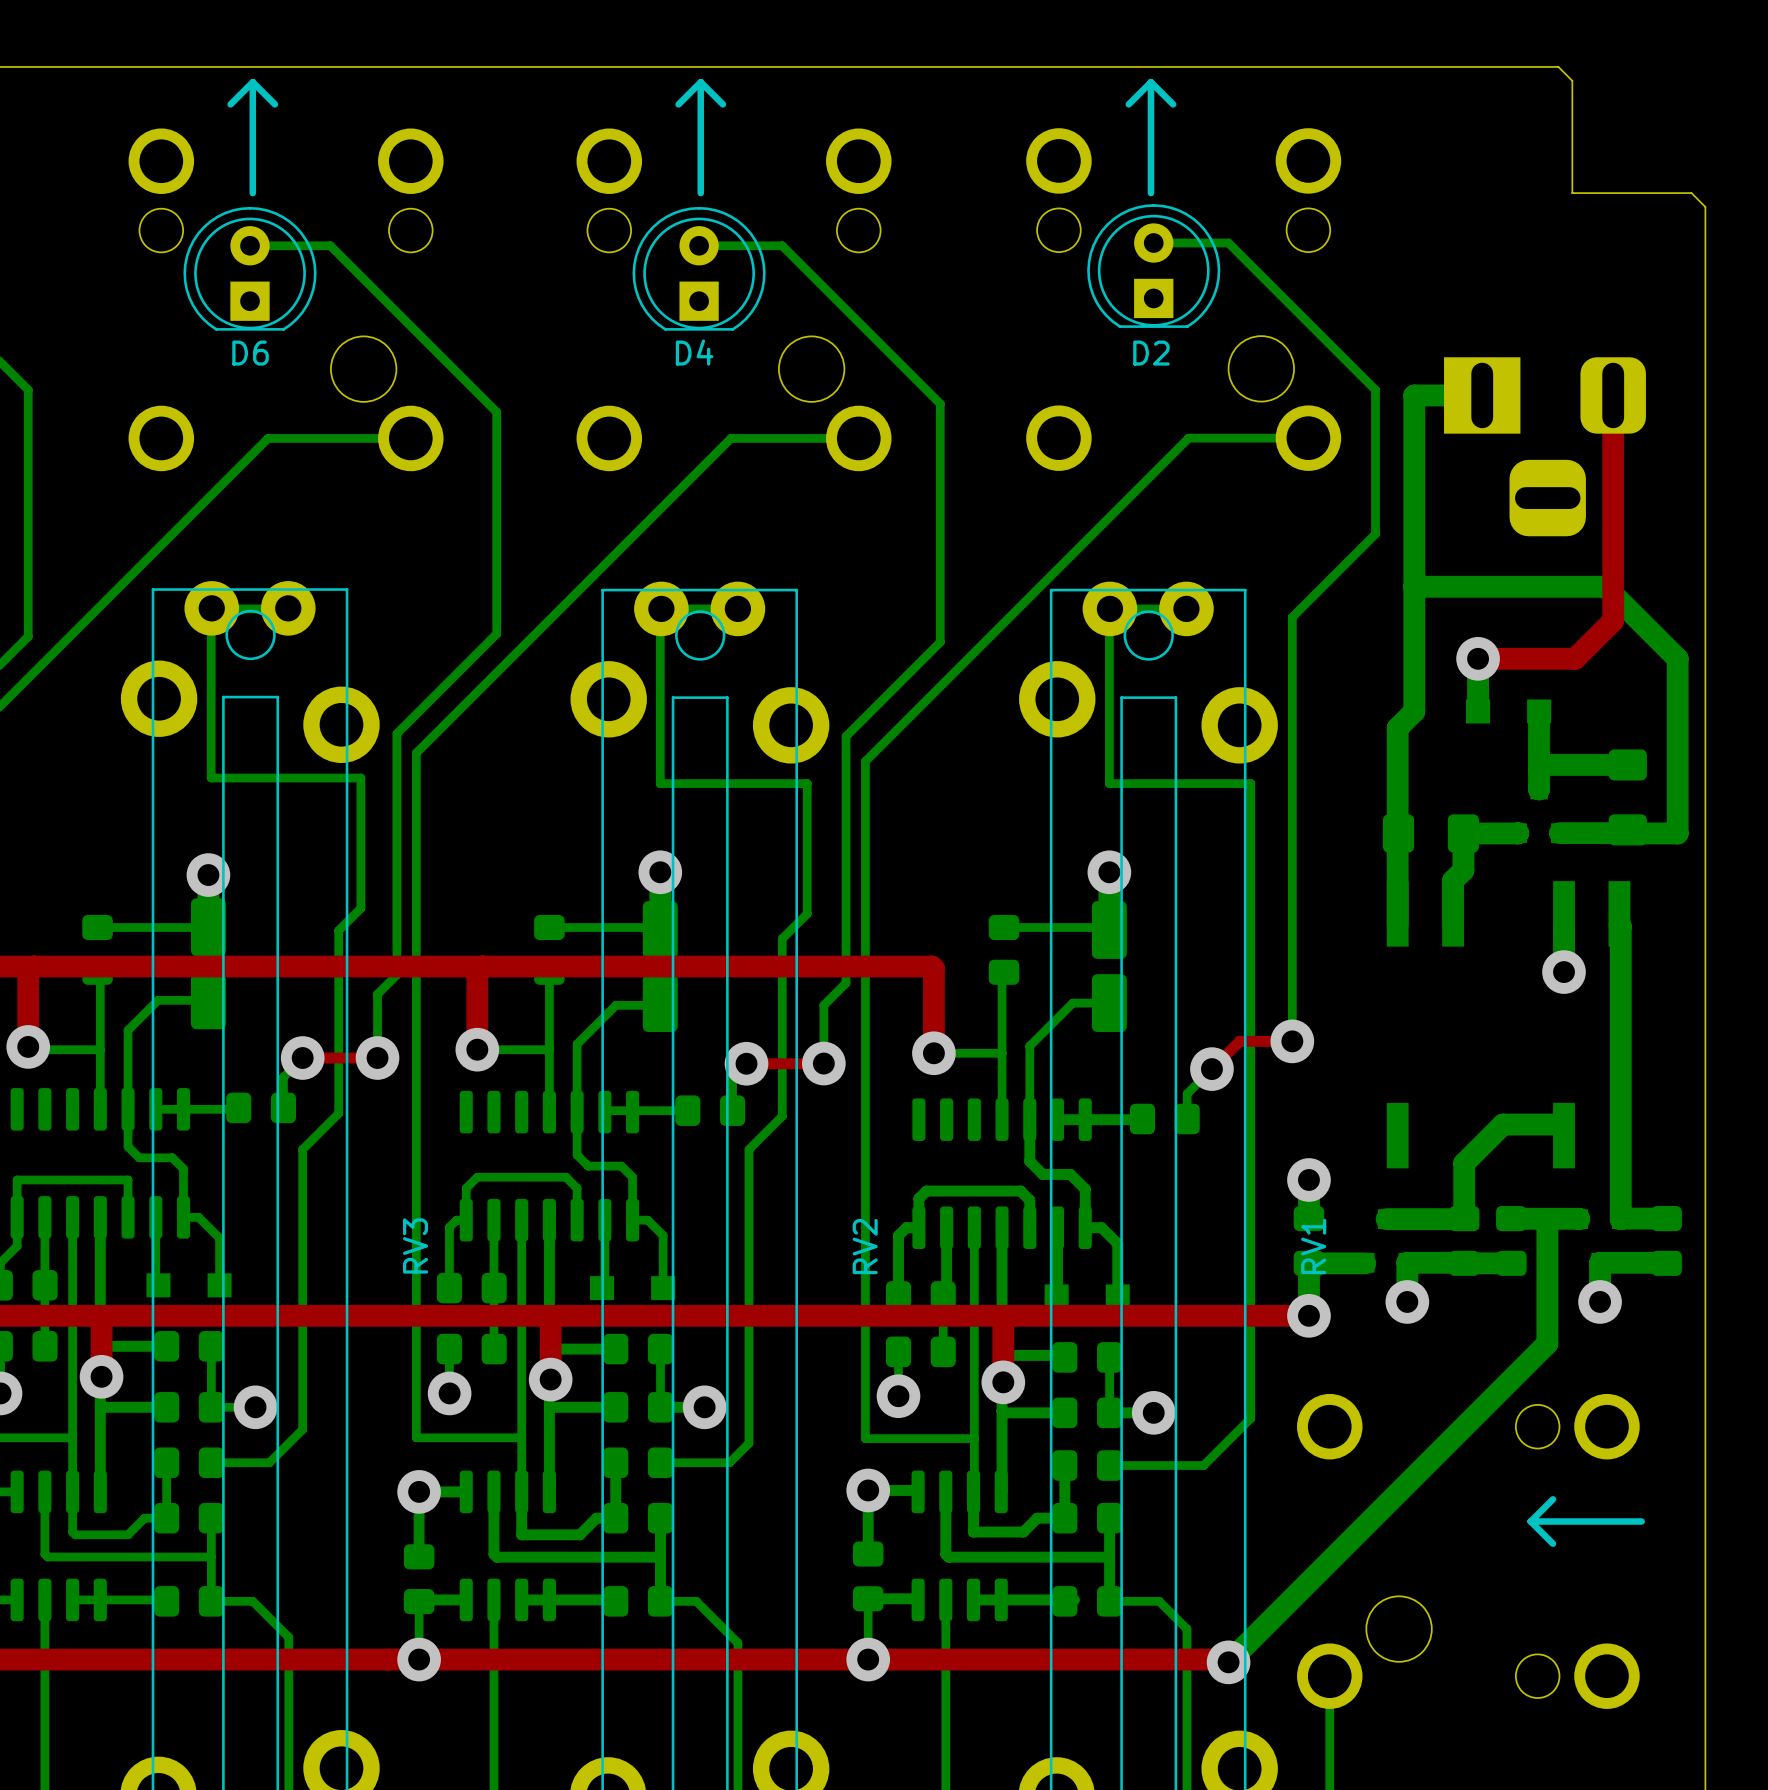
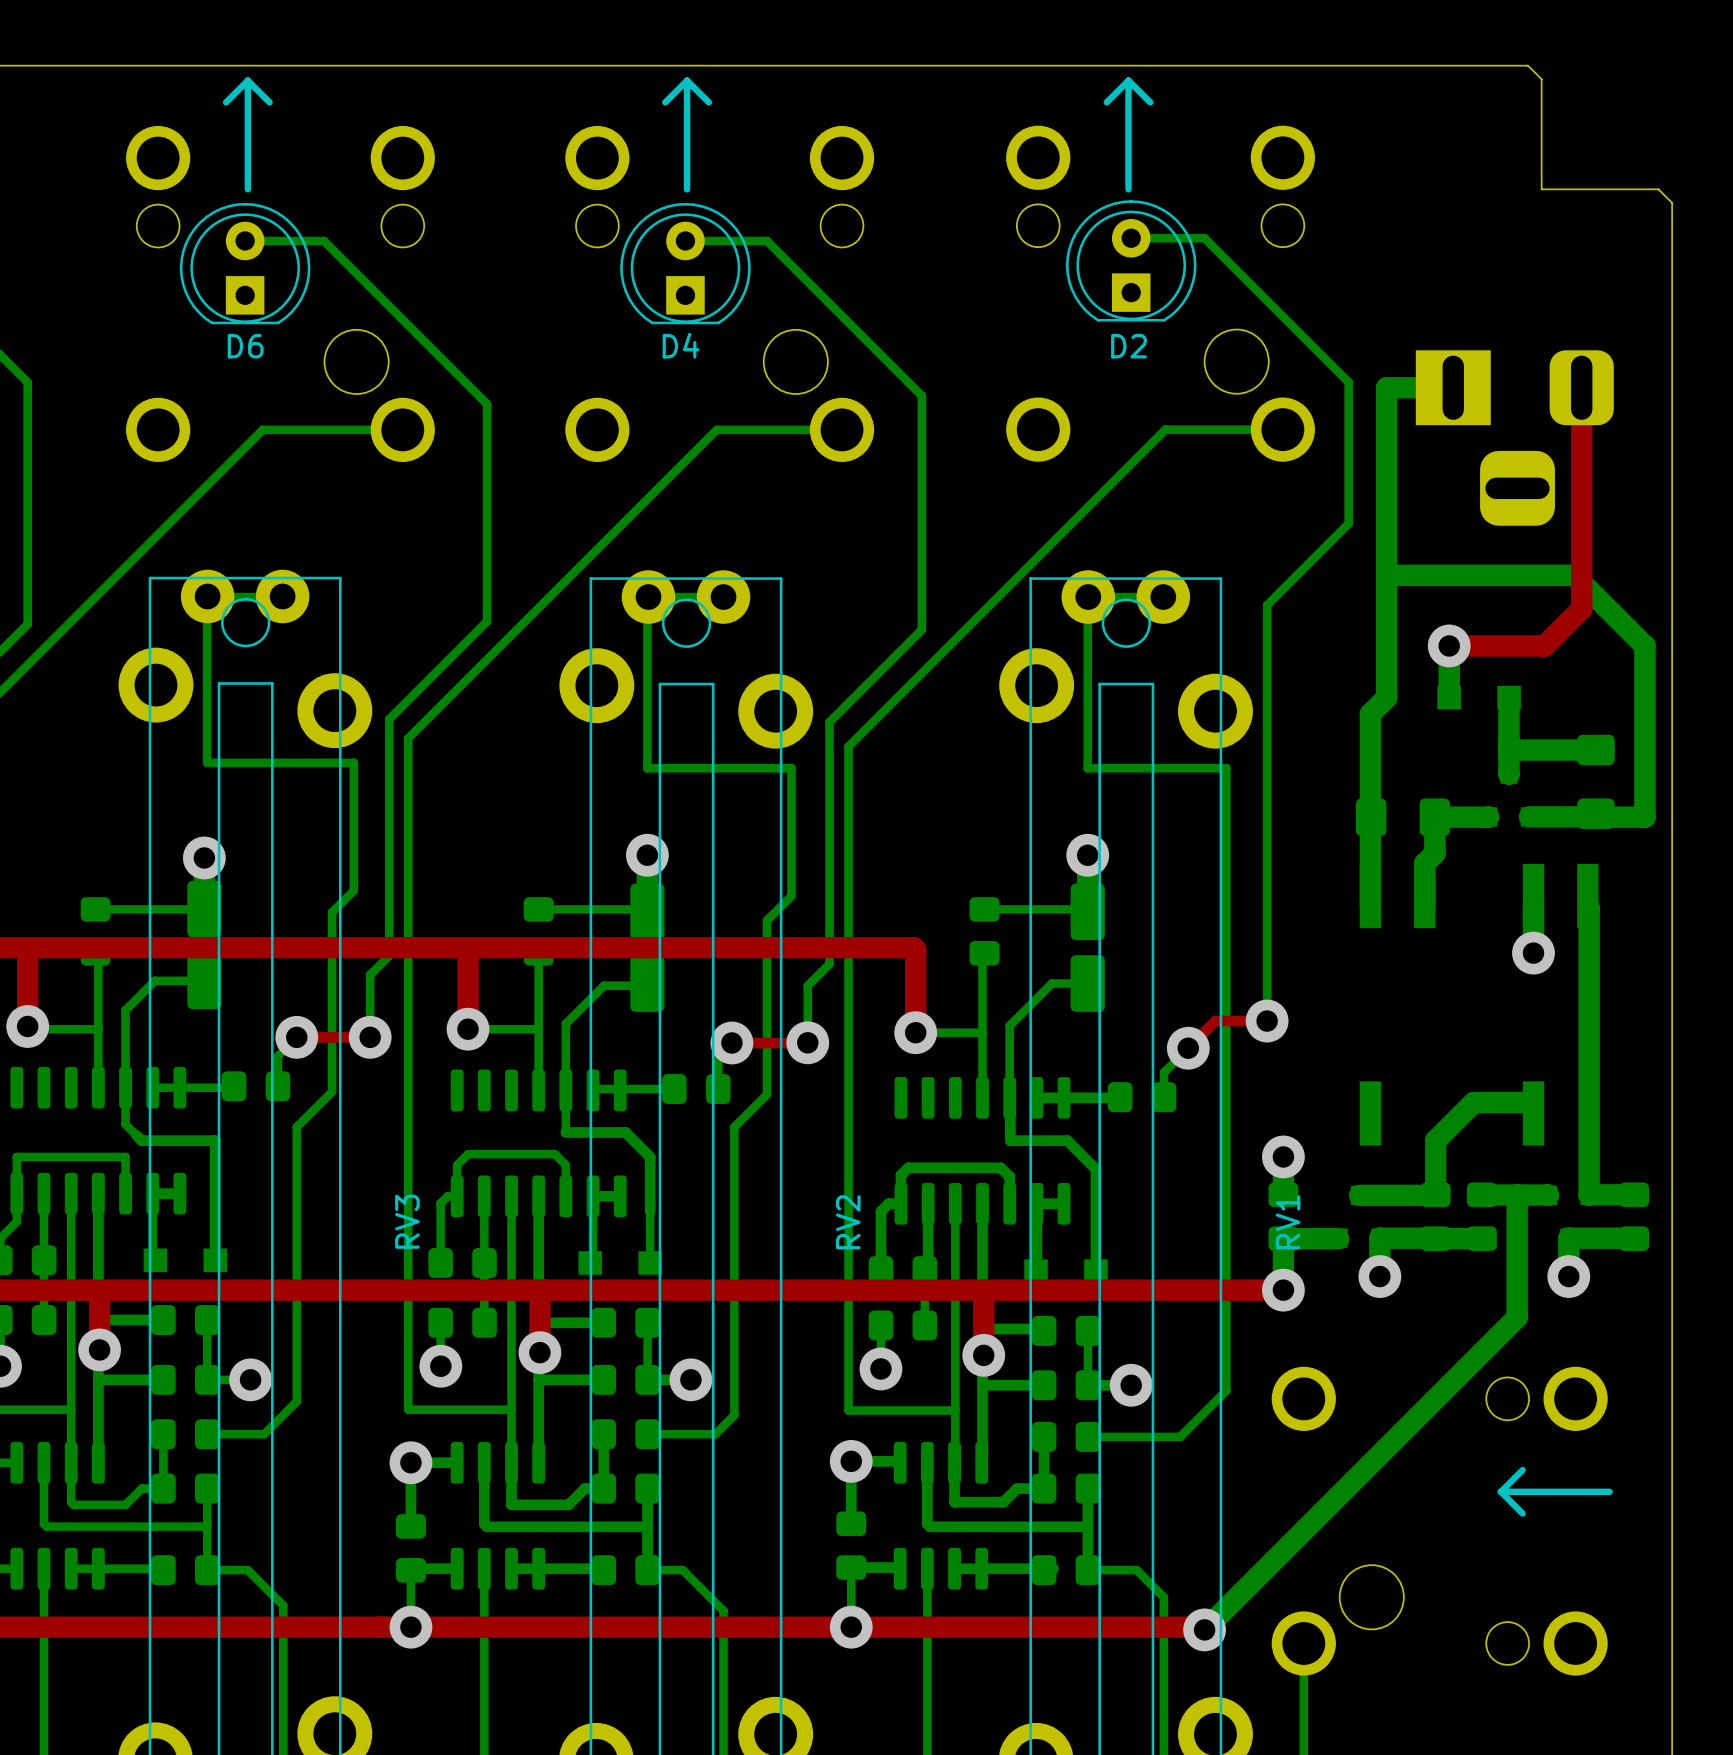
bottom track: (1029, 1119) (1029, 1161) (1042, 1174) (1070, 1174) (1085, 1189) (1085, 1227) (1101, 1227) (1117, 1243) -> (1009, 1097) (1010, 1140) (1067, 1140) (1095, 1169) (1095, 1219)
bottom track: (577, 1155) (588, 1166) (621, 1166) (632, 1177) (632, 1220) (647, 1220) (663, 1235) -> (565, 1132) (625, 1132) (650, 1157) (650, 1211)
bottom track: (139, 1157) (172, 1157) (183, 1168) (183, 1217) (198, 1217) (219, 1238) (219, 1285) -> (136, 1135) (141, 1140) (215, 1140) (215, 1260)
bottom track: none -> (152, 1193) (179, 1193)
bottom track: none -> (593, 1196) (620, 1196)
bottom track: none -> (1036, 1203) (1064, 1203)

